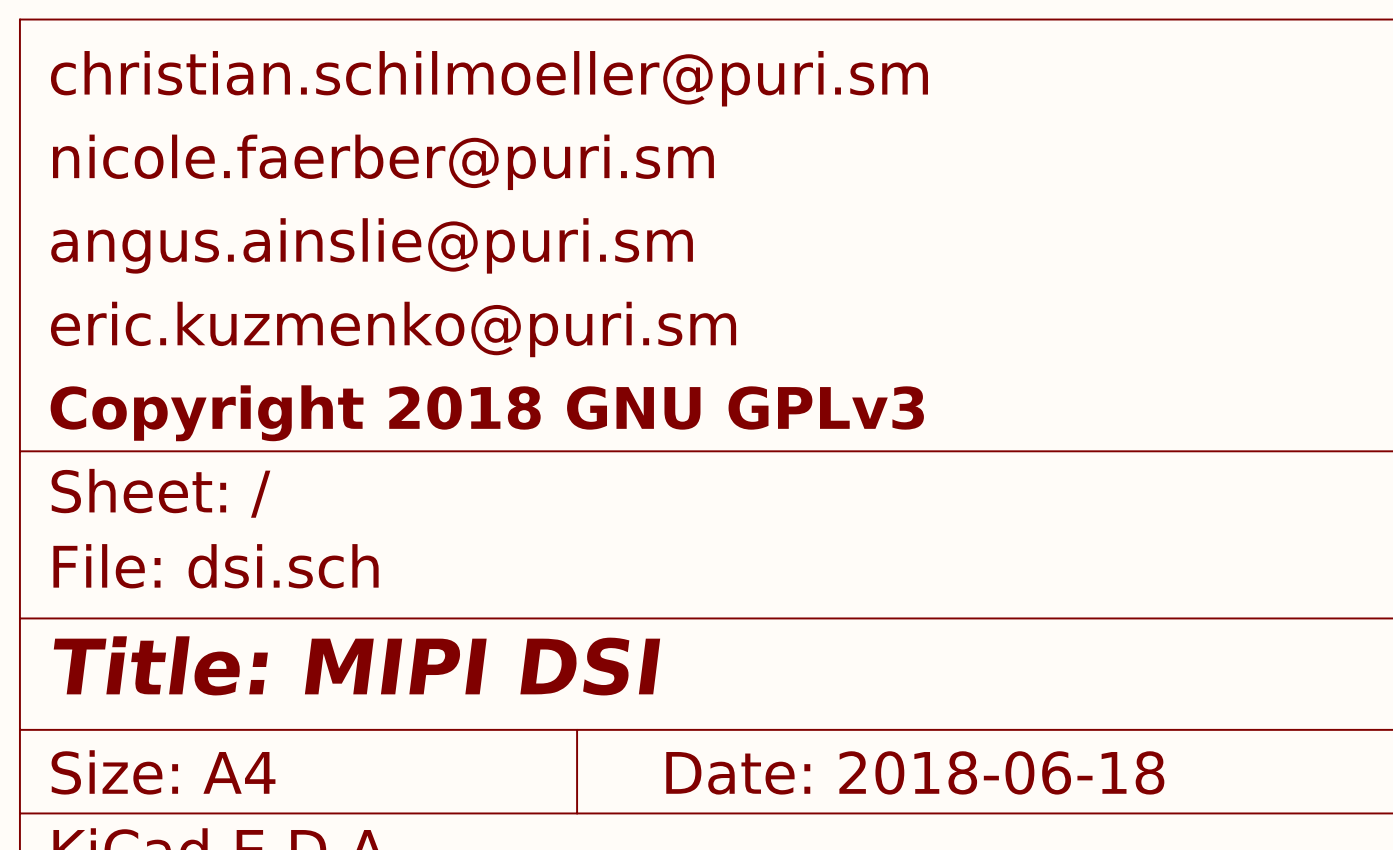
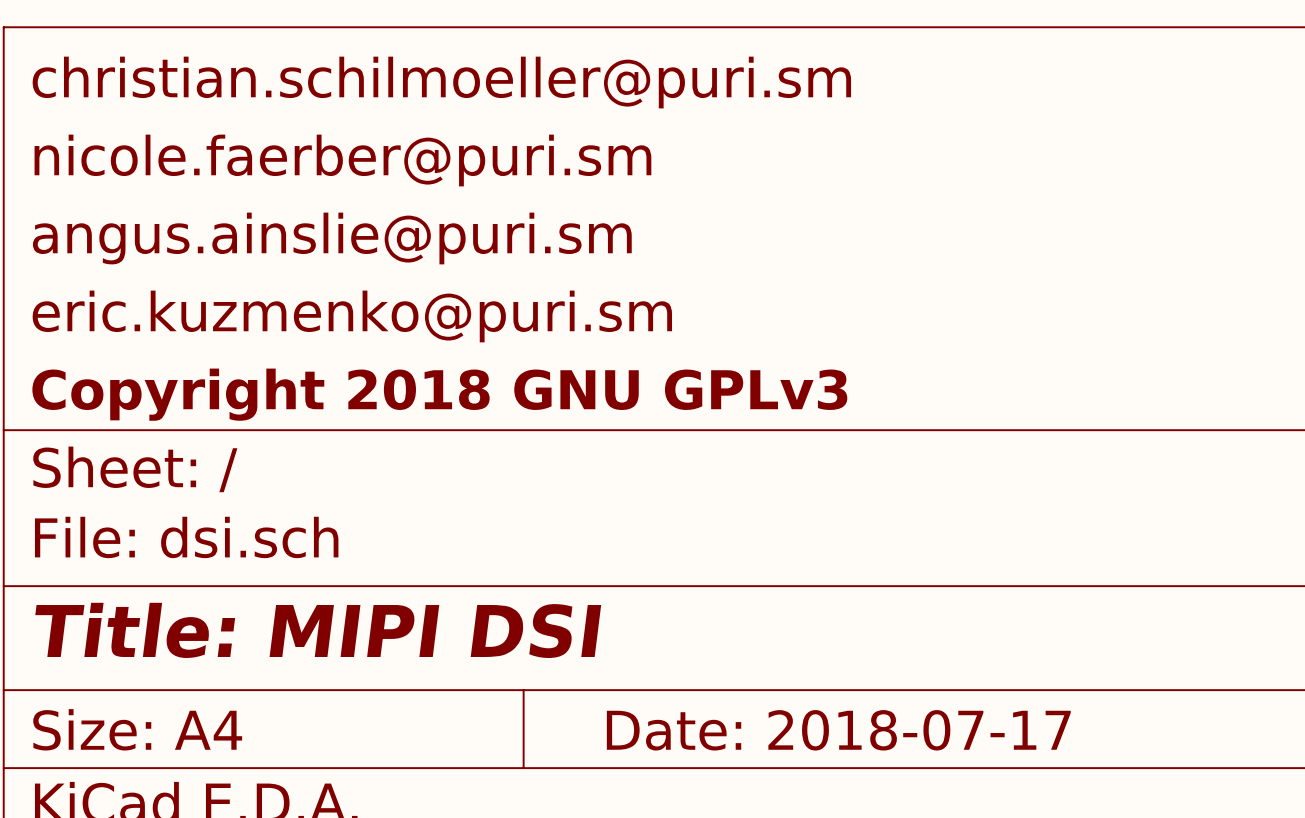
title block: Date: 2018-06-18 (915, 772) -> Date: 2018-07-17 (838, 730)

